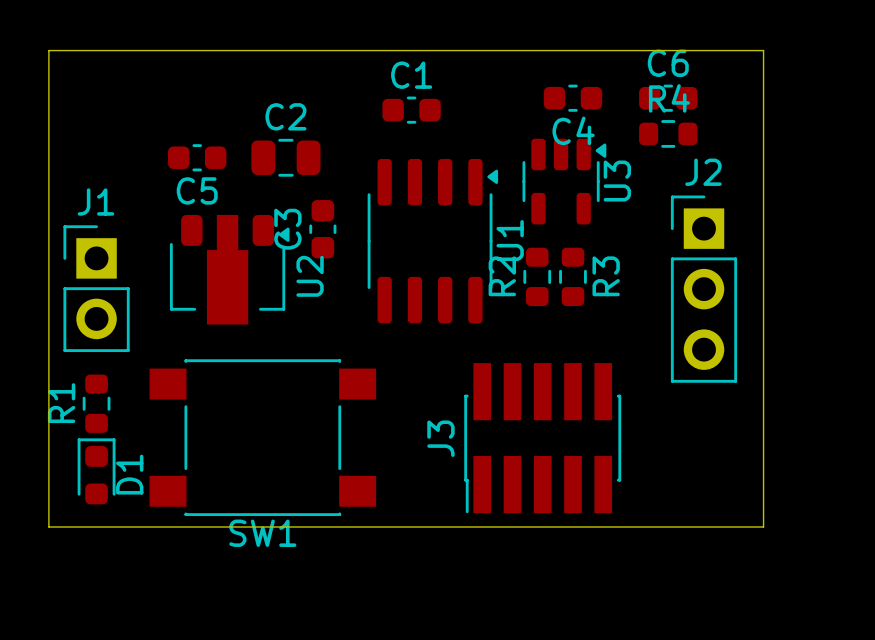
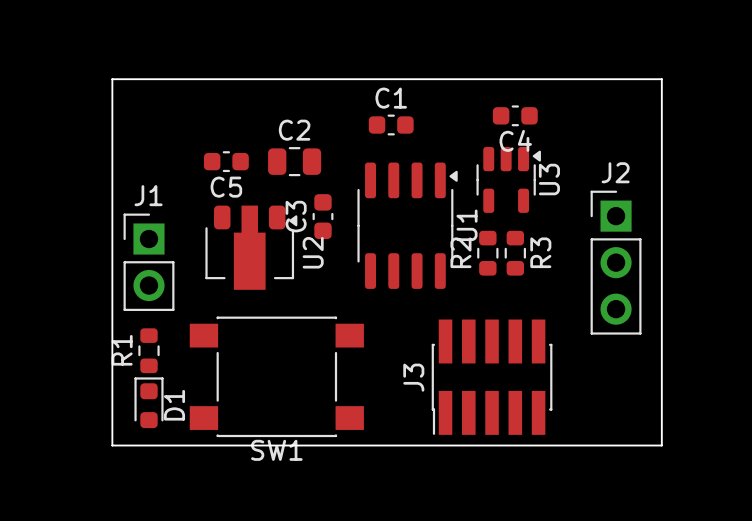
C6: (668, 98) -> none
R4: (668, 133) -> none

